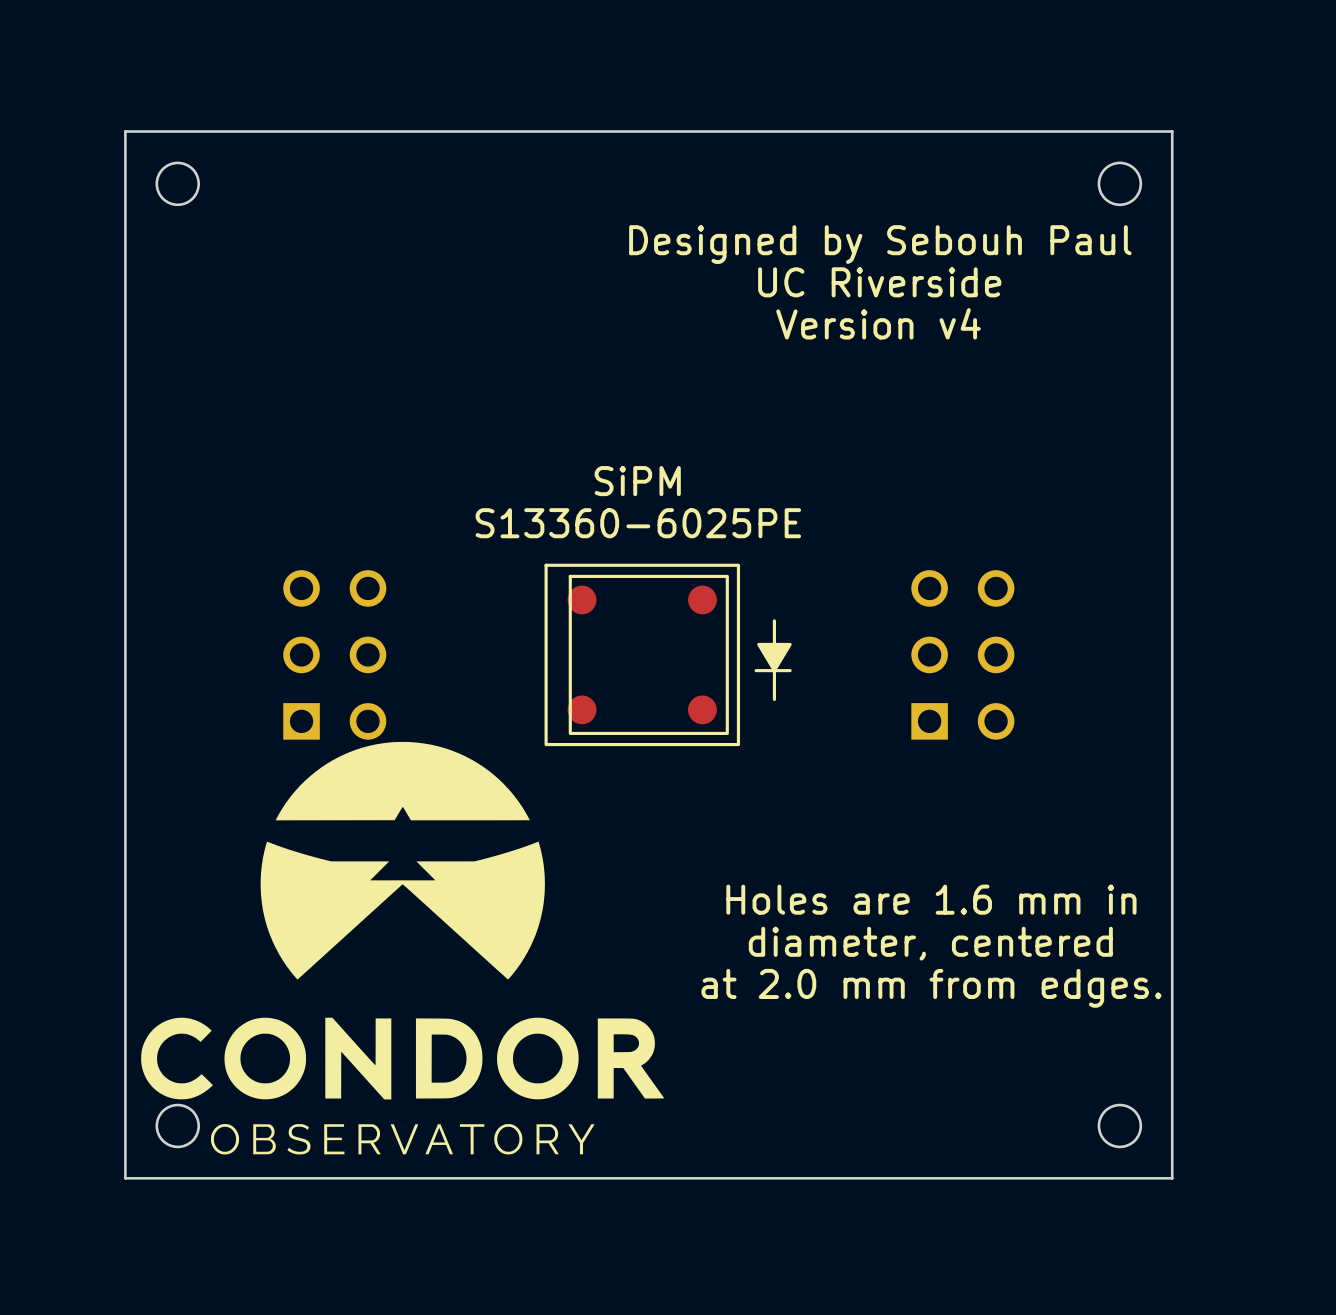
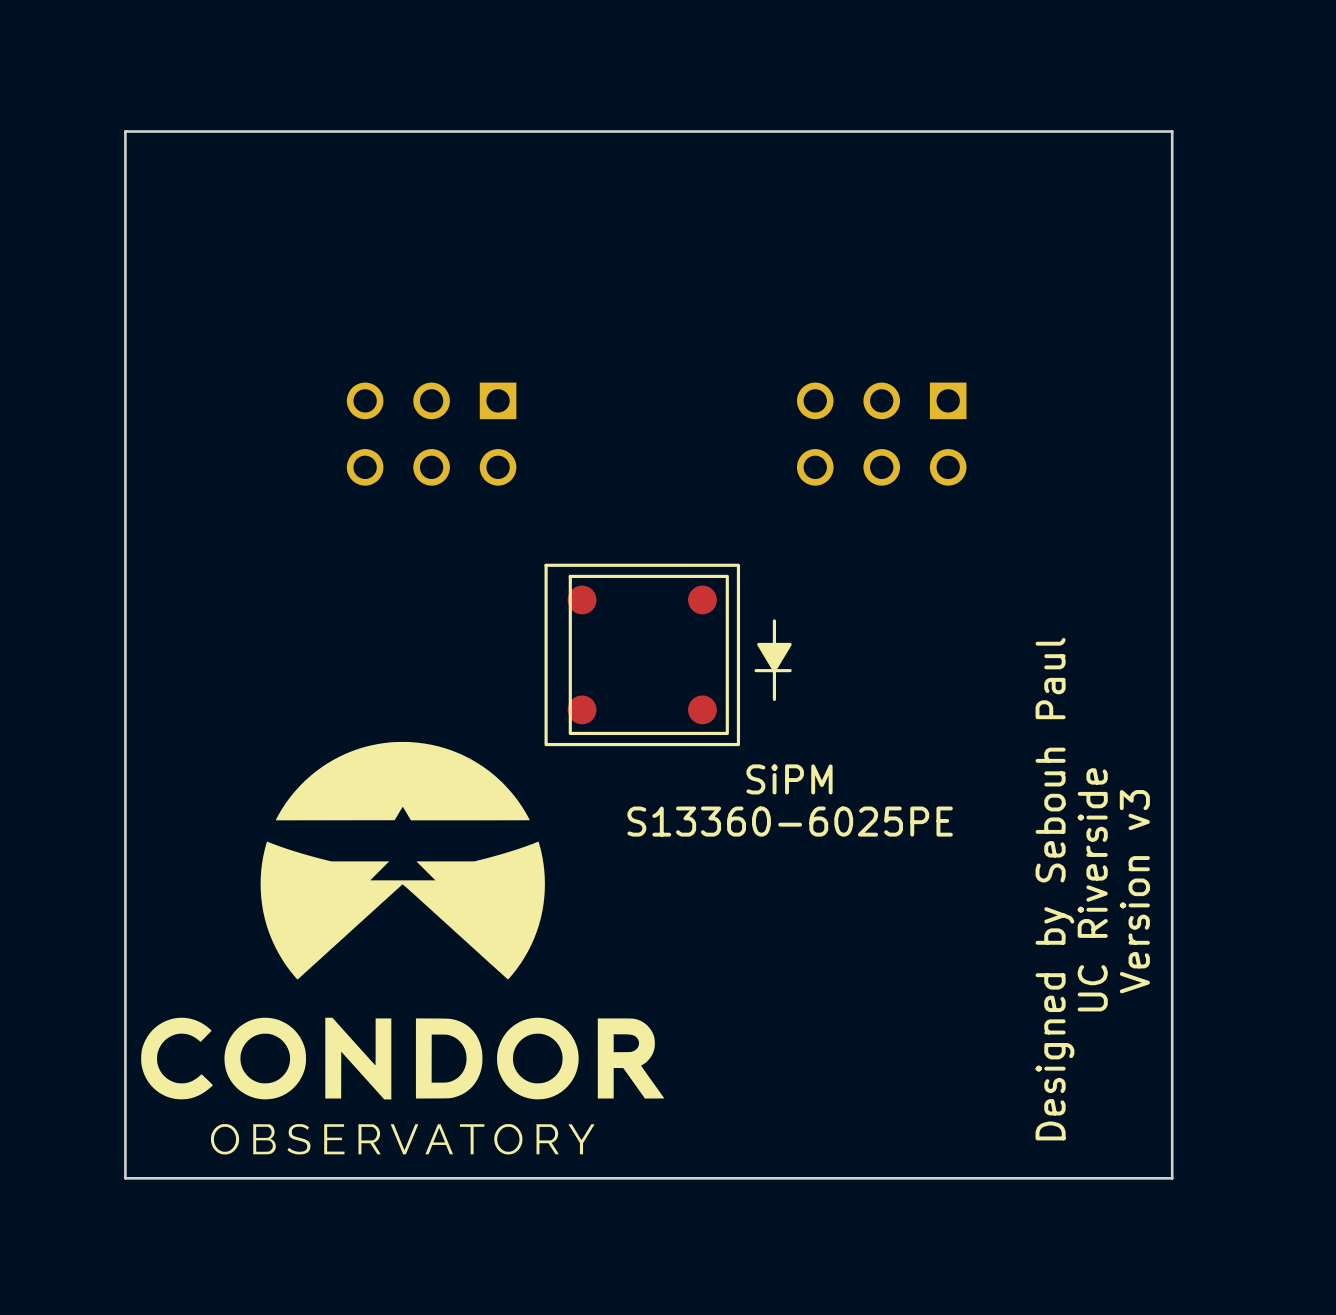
round board edge: [155, 161, 200, 207] -> none
round board edge: [1097, 161, 1143, 207] -> none
text: Designed by Sebouh Paul (880, 244) -> none
text rotation: 0° (879, 282) -> 90° counterclockwise (1092, 889)
text position: UC Riverside (879, 282) -> UC Riverside (1092, 889)
text: Version v4 (878, 323) -> none
part: none -> (431, 434)
part: none -> (881, 434)
text position: SiPM (637, 481) -> SiPM (789, 779)
text position: S13360-6025PE (638, 523) -> S13360-6025PE (790, 821)
part: (334, 654) -> none
part: (962, 654) -> none
text: none -> Designed by Sebouh Paul (1054, 889)
text: none -> Version v3 (1134, 891)
text: Holes are 1.6 mm in (931, 899) -> none
text: diameter, centered (930, 943) -> none
text: at 2.0 mm from edges. (931, 988) -> none
round board edge: [155, 1103, 200, 1149] -> none
round board edge: [1097, 1103, 1143, 1149] -> none

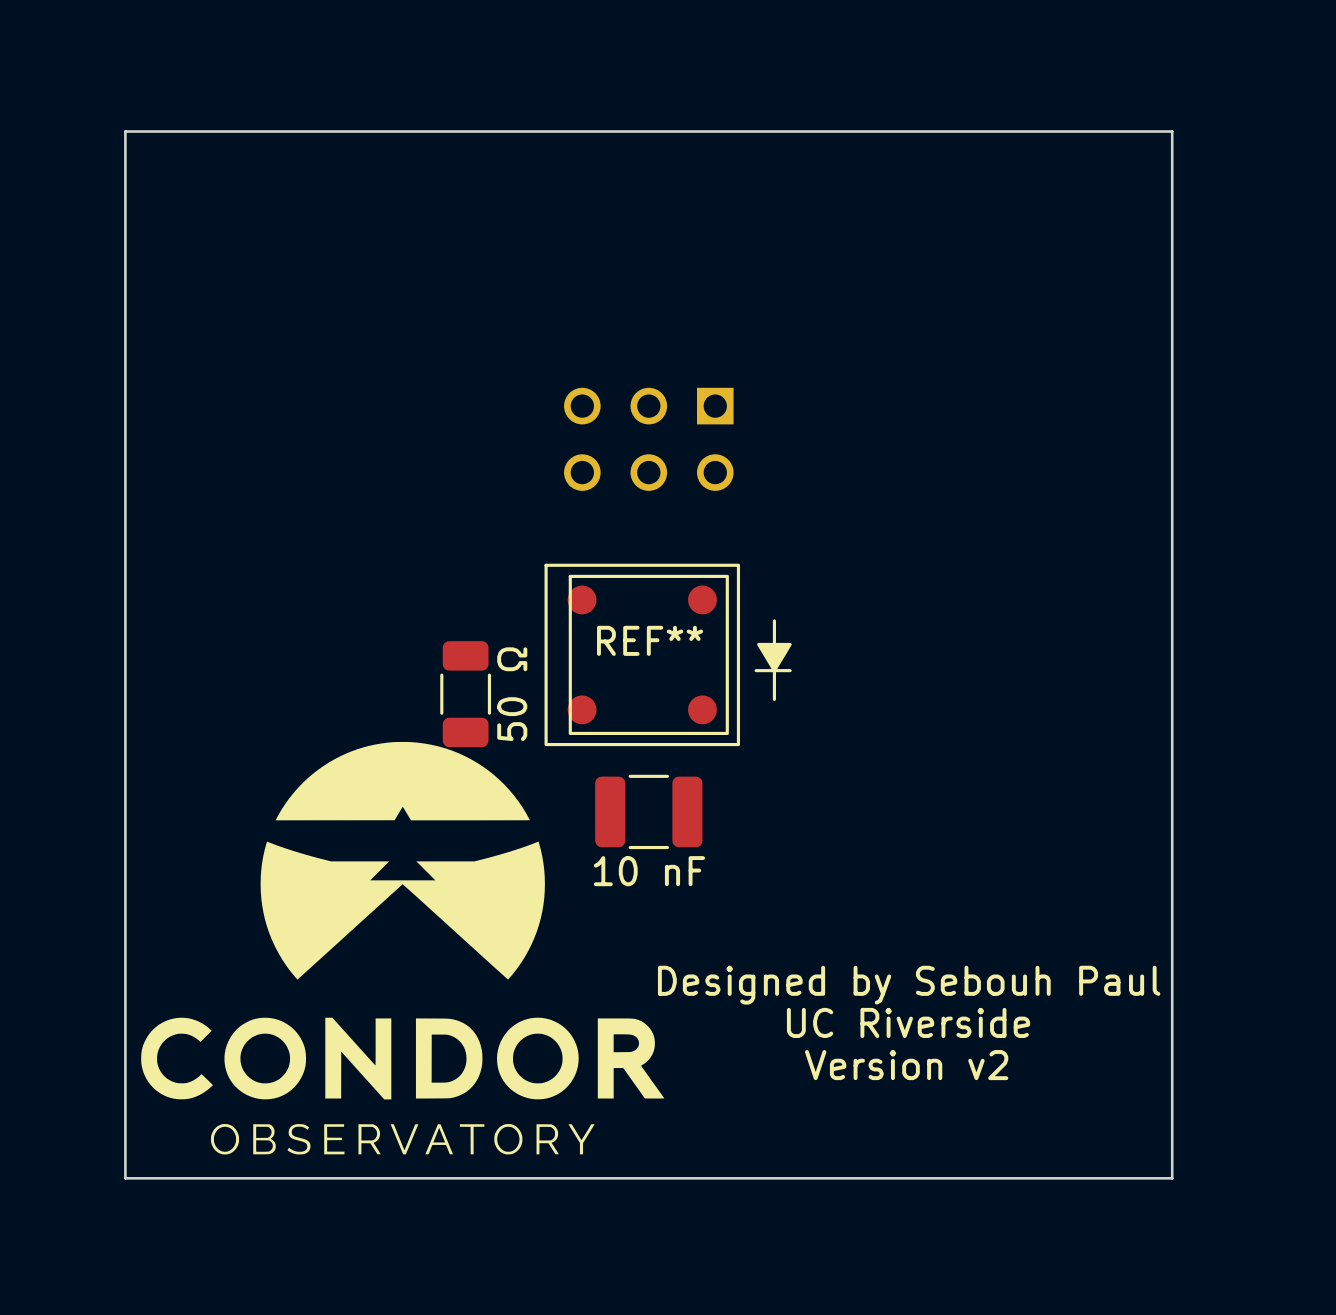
part: (431, 434) -> none
part: (881, 434) -> none
part: none -> (648, 439)
REF** name: none -> REF** (650, 640)
50 Ω: none -> (465, 694)
text: SiPM (789, 779) -> none
10 nF: none -> (648, 811)
text: S13360-6025PE (790, 821) -> none
text rotation: 0° (1054, 889) -> 90° clockwise (909, 985)
text rotation: 0° (1092, 889) -> 90° clockwise (908, 1022)
text: Version v3 (1134, 891) -> none
text: none -> Version v2 (906, 1065)

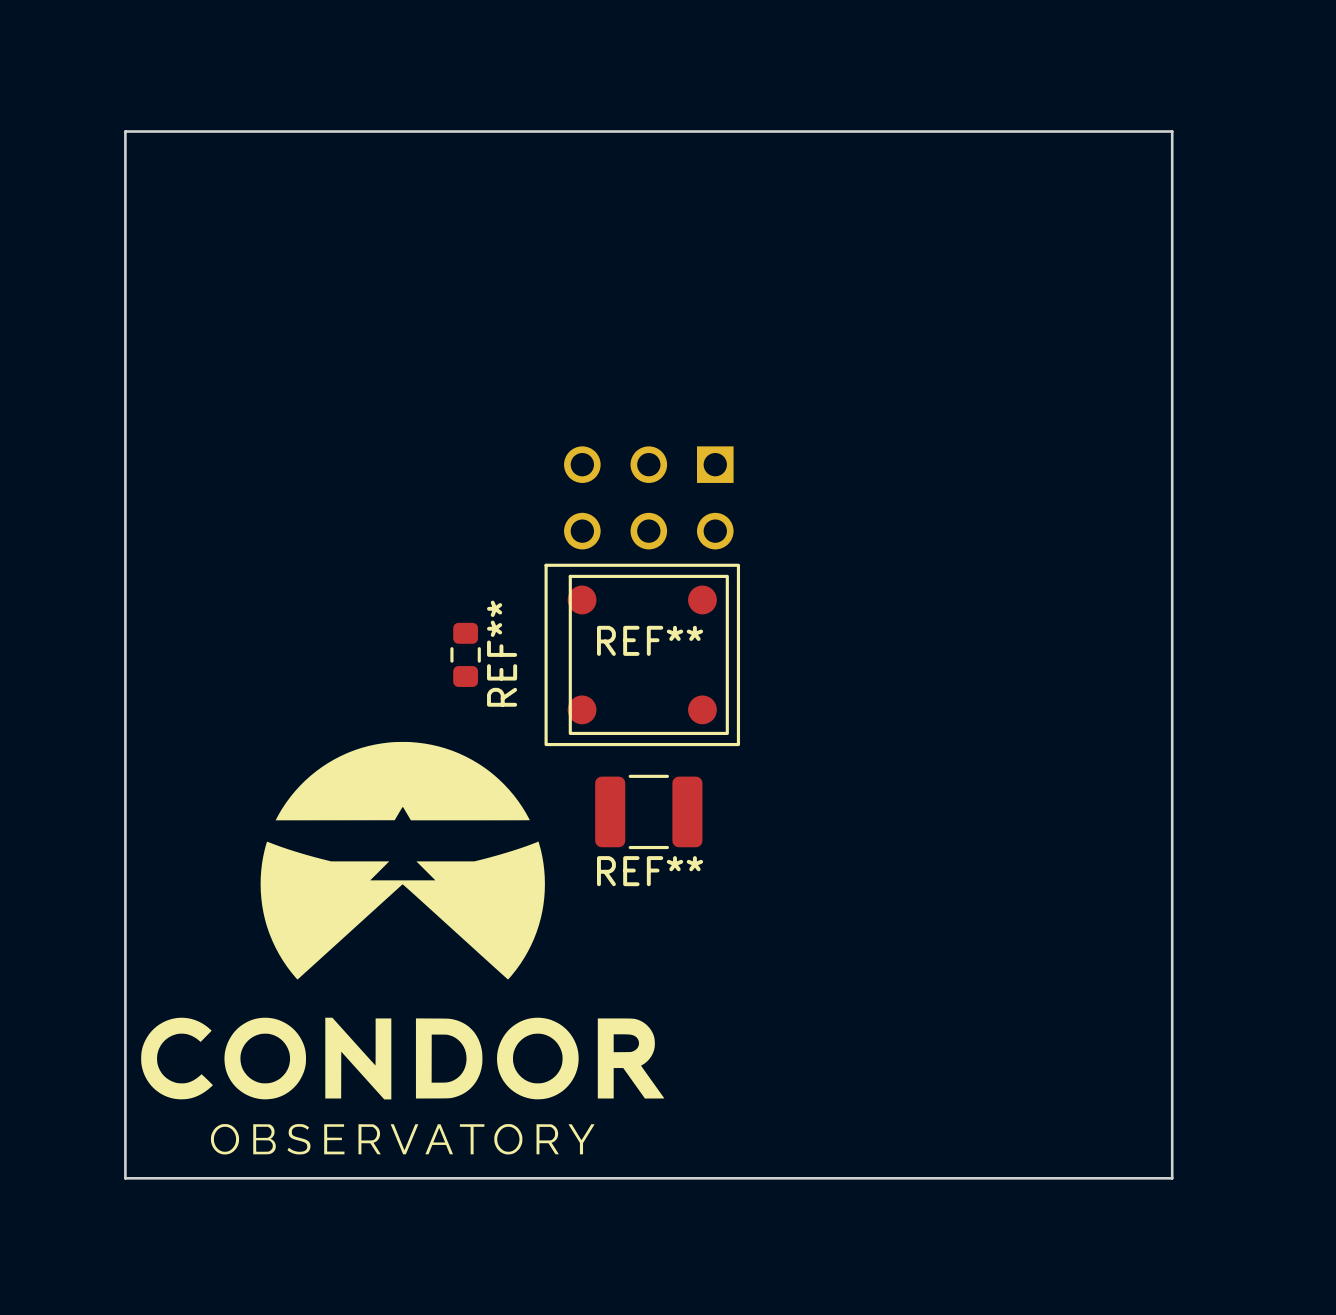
part position: (648, 439) -> (648, 497)
drawing: [754, 619, 792, 701] -> none
REF**: none -> (465, 654)
50 Ω: (465, 694) -> none
10 nF name: 10 nF (649, 871) -> REF** (650, 871)
text: Designed by Sebouh Paul (909, 985) -> none
text: UC Riverside (908, 1022) -> none
text: Version v2 (906, 1065) -> none

